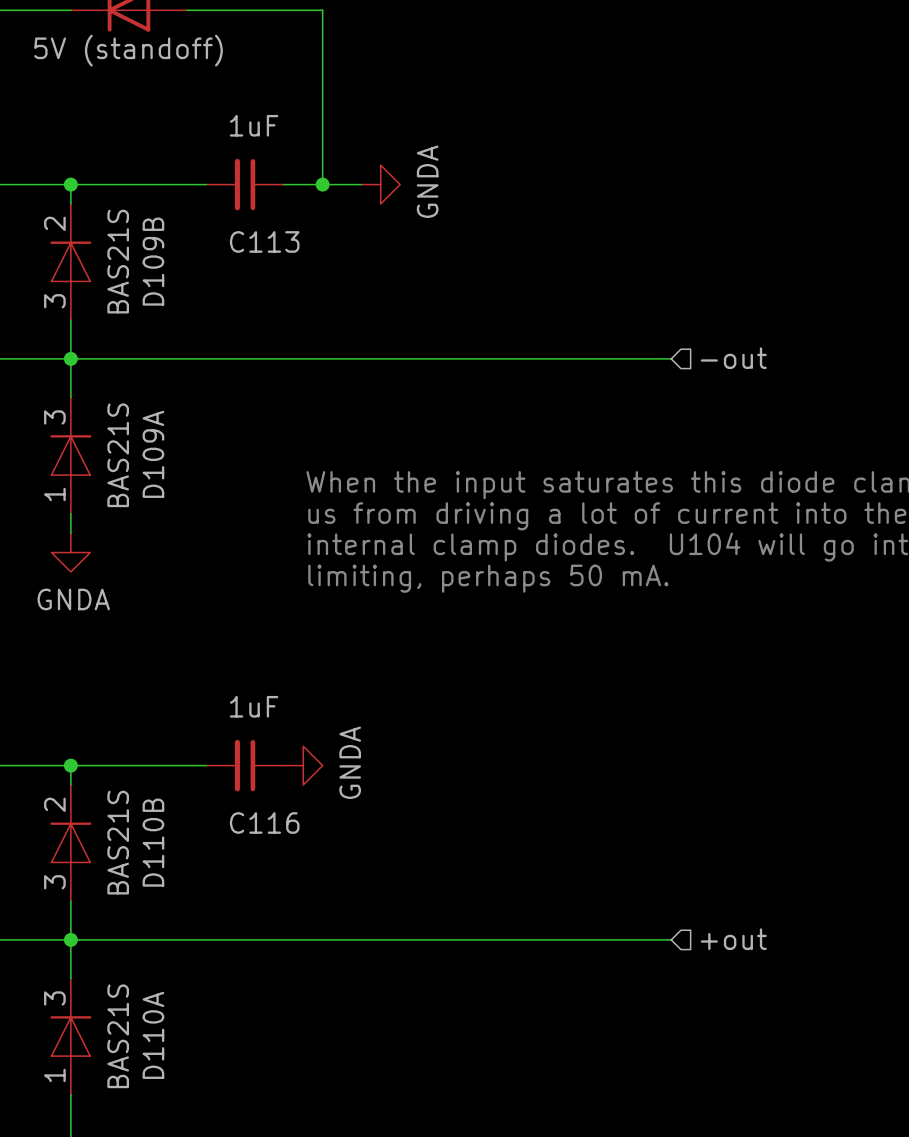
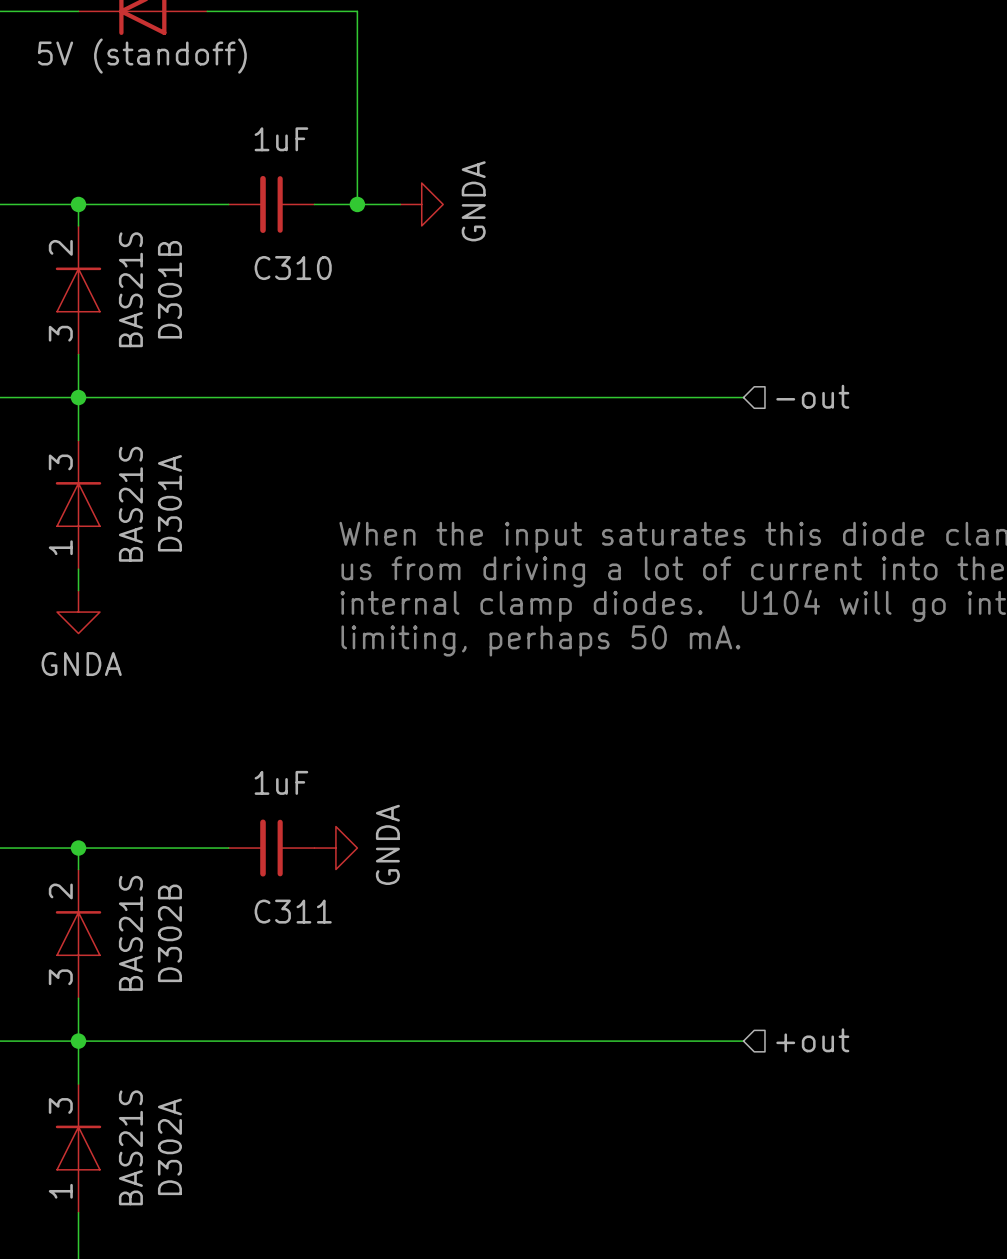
C113 name: C113 (264, 241) -> C310 (293, 268)
D109B name: D109B (153, 261) -> D301B (169, 289)
D109A name: D109A (153, 454) -> D301A (169, 503)
C116 name: C116 (264, 822) -> C311 (293, 911)
D110B name: D110B (153, 842) -> D302B (169, 933)
D110A name: D110A (153, 1035) -> D302A (169, 1146)

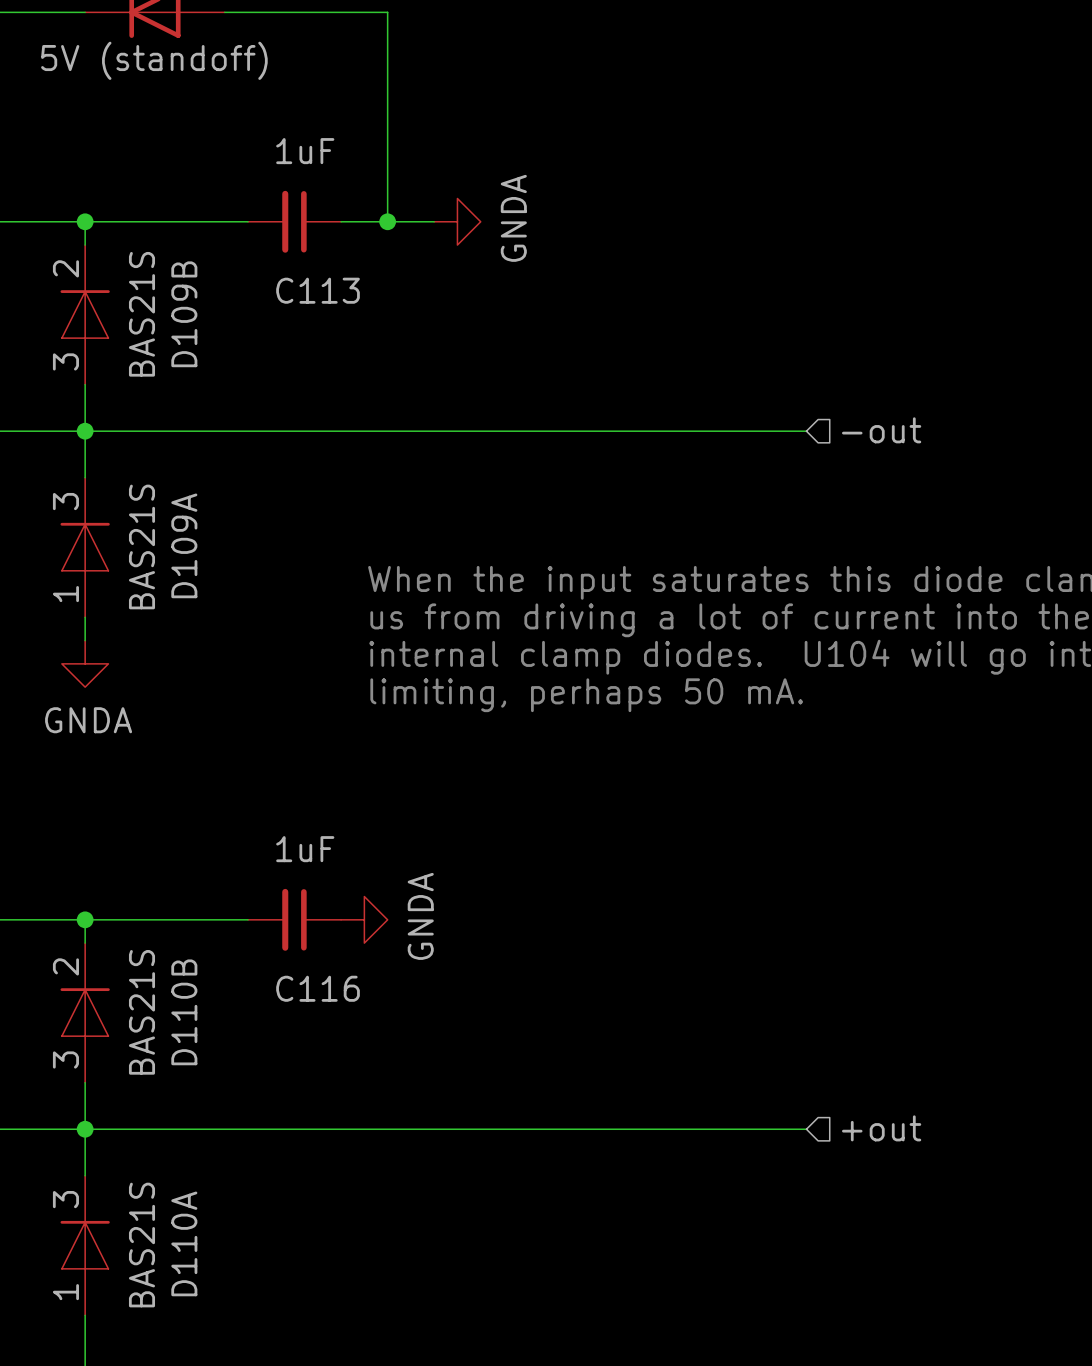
C310 name: C310 (293, 268) -> C113 (318, 290)
D301B name: D301B (169, 289) -> D109B (184, 314)
D301A name: D301A (169, 503) -> D109A (184, 545)
C311 name: C311 (293, 911) -> C116 (318, 988)
D302B name: D302B (169, 933) -> D110B (184, 1012)
D302A name: D302A (169, 1146) -> D110A (184, 1243)

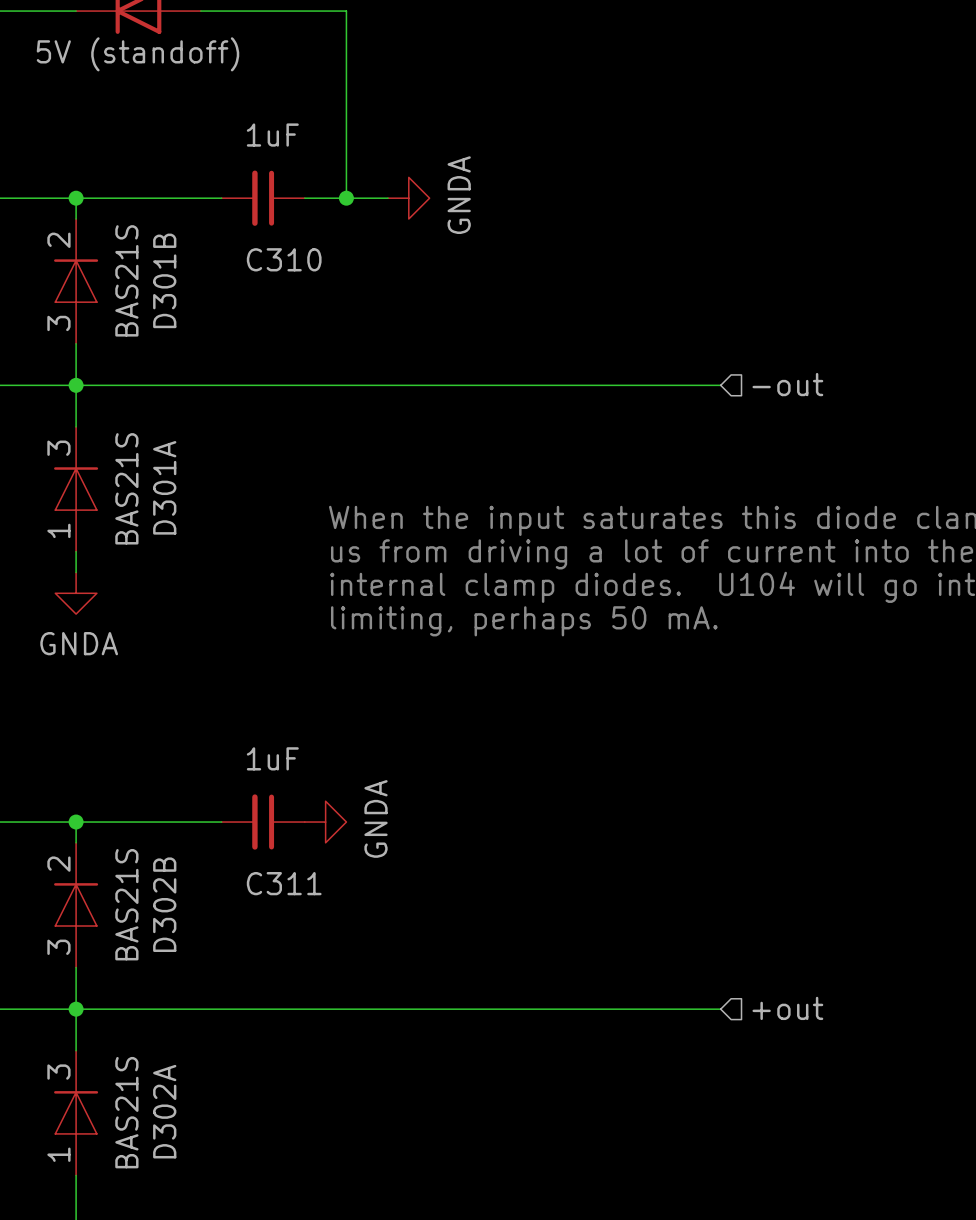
C113 name: C113 (318, 290) -> C310 (284, 259)
D109B name: D109B (184, 314) -> D301B (164, 280)
D109A name: D109A (184, 545) -> D301A (164, 487)
C116 name: C116 (318, 988) -> C311 (284, 883)
D110B name: D110B (184, 1012) -> D302B (164, 904)
D110A name: D110A (184, 1243) -> D302A (164, 1111)

